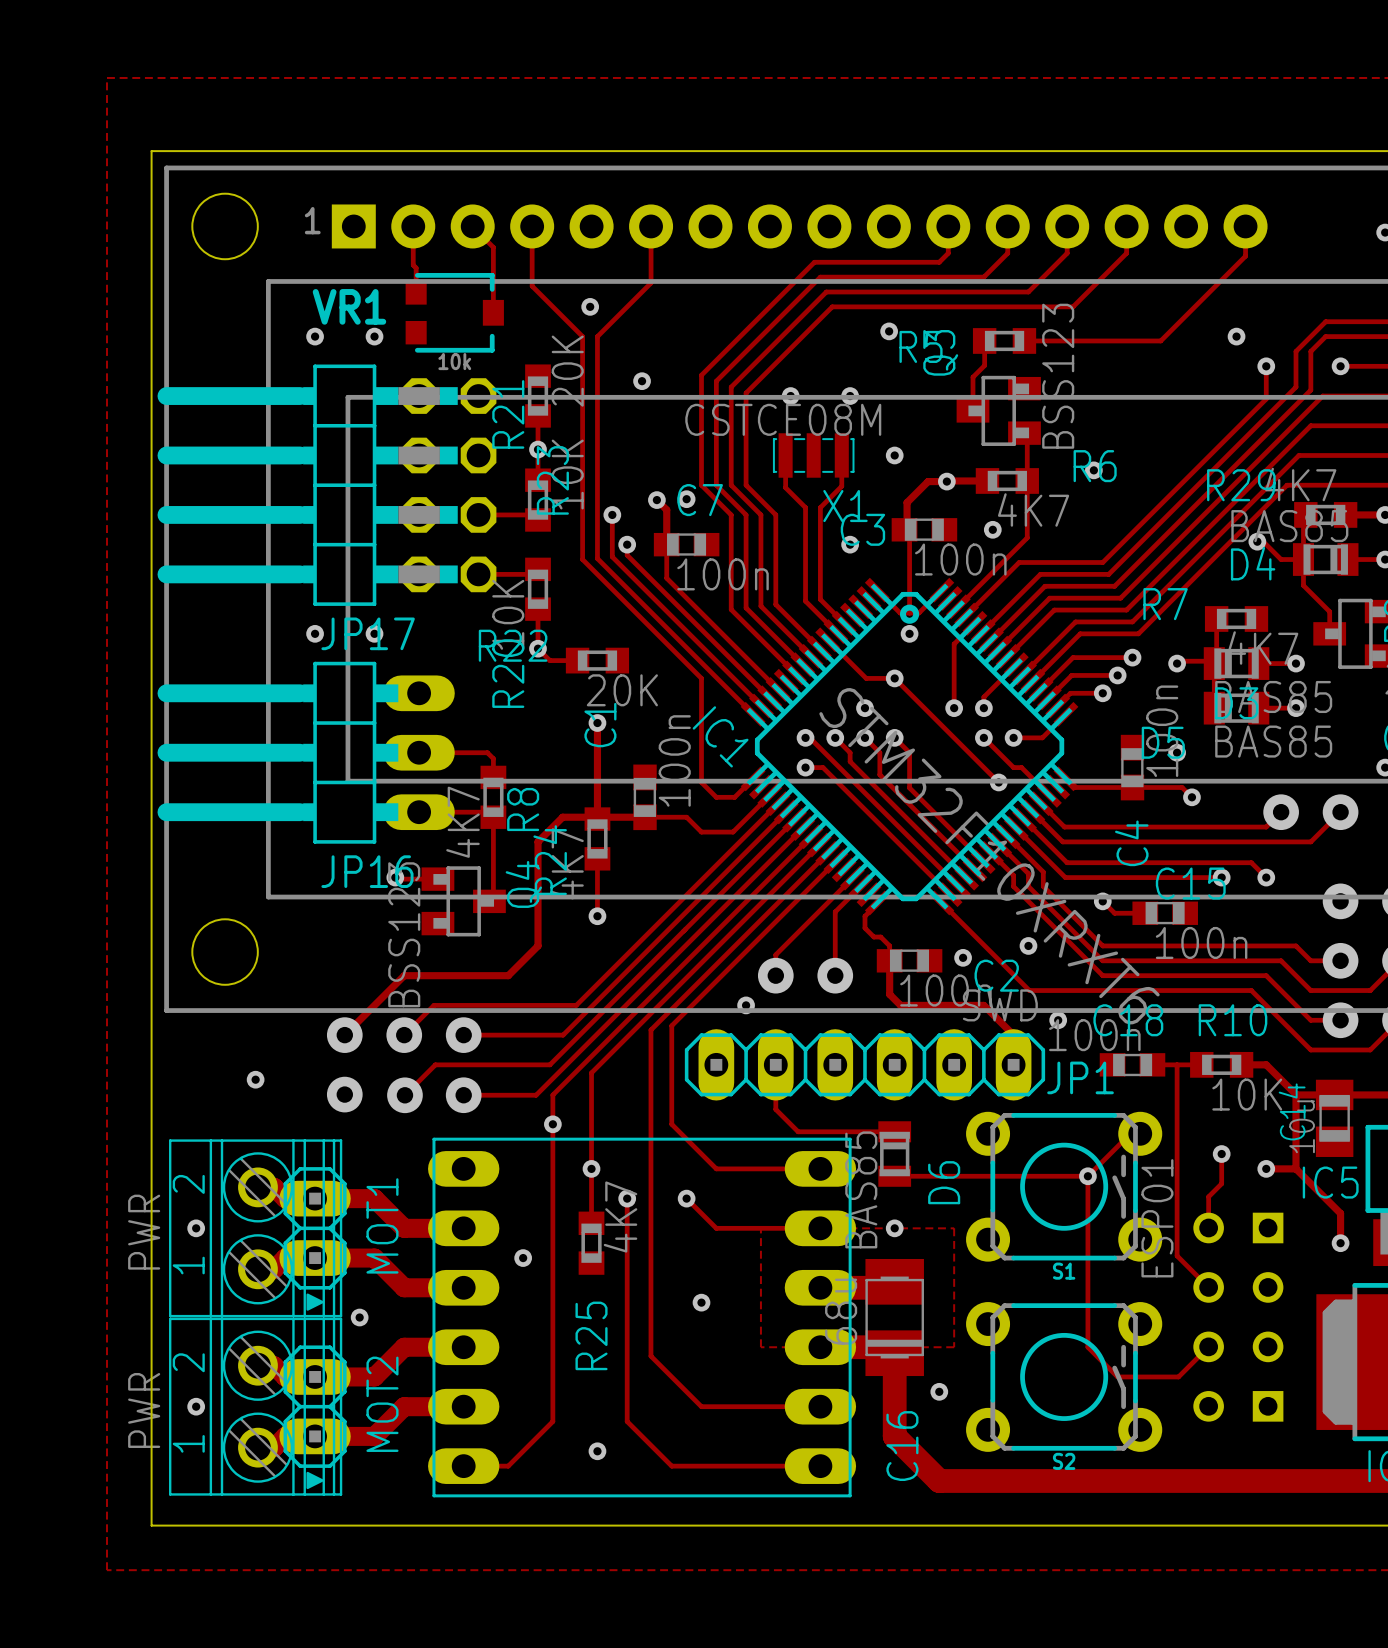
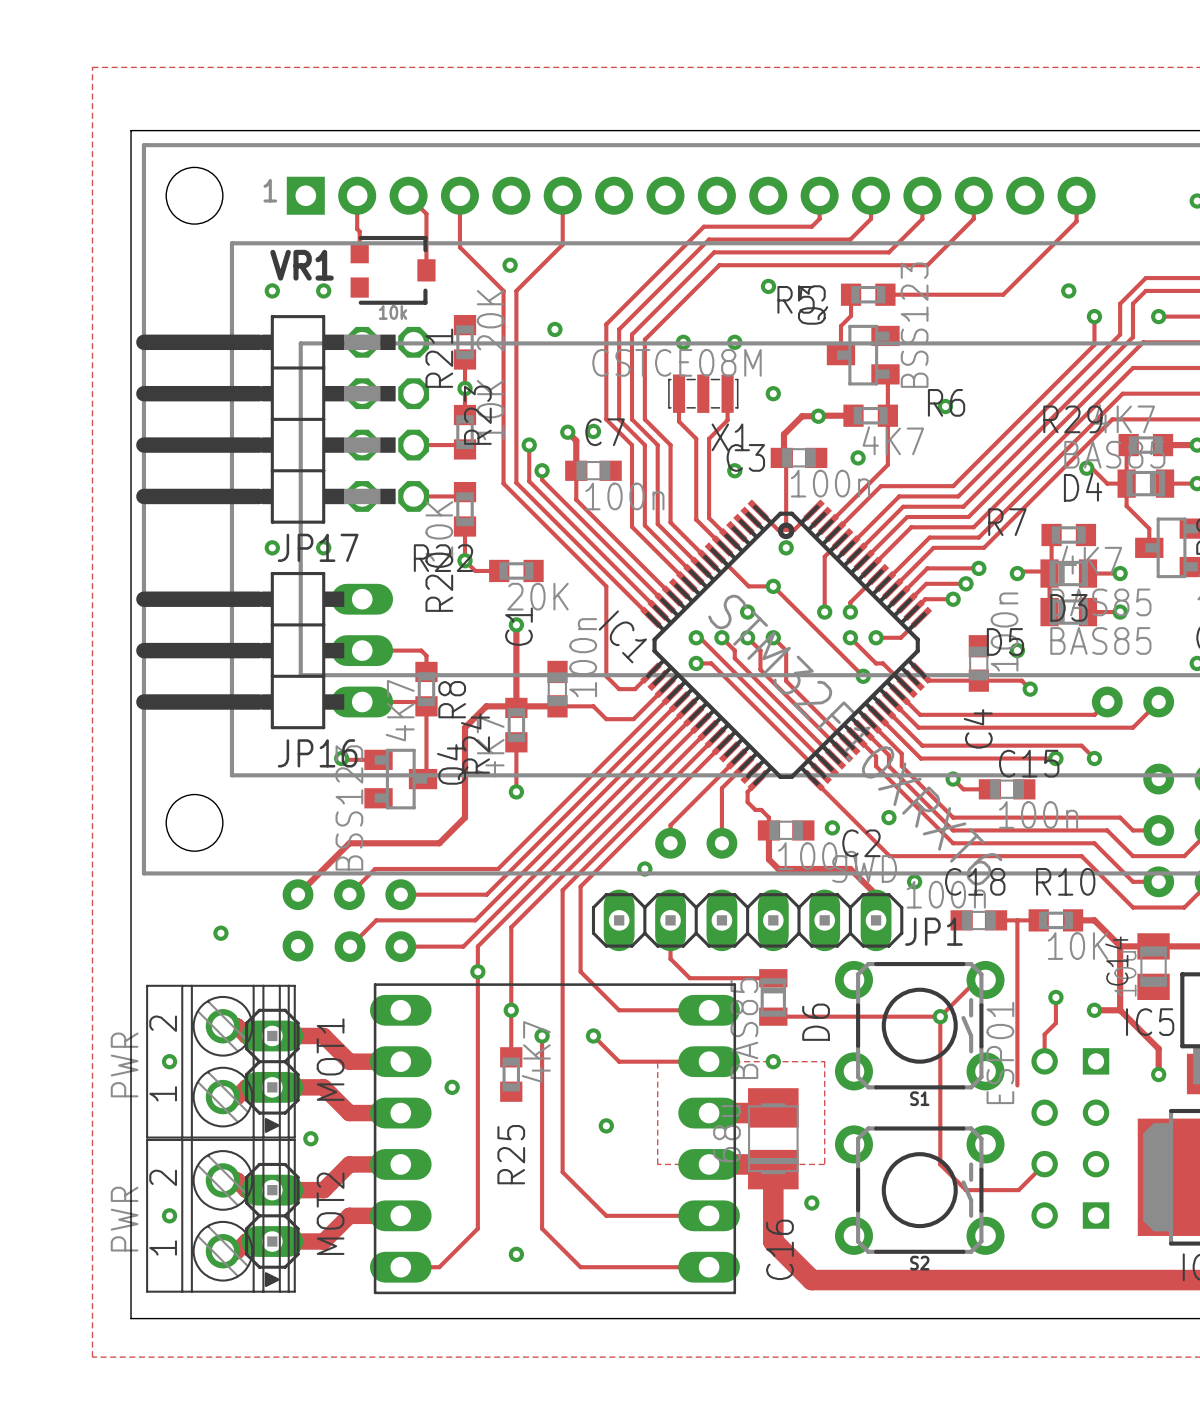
track: (1177, 1255) (1208, 1287) -> none

